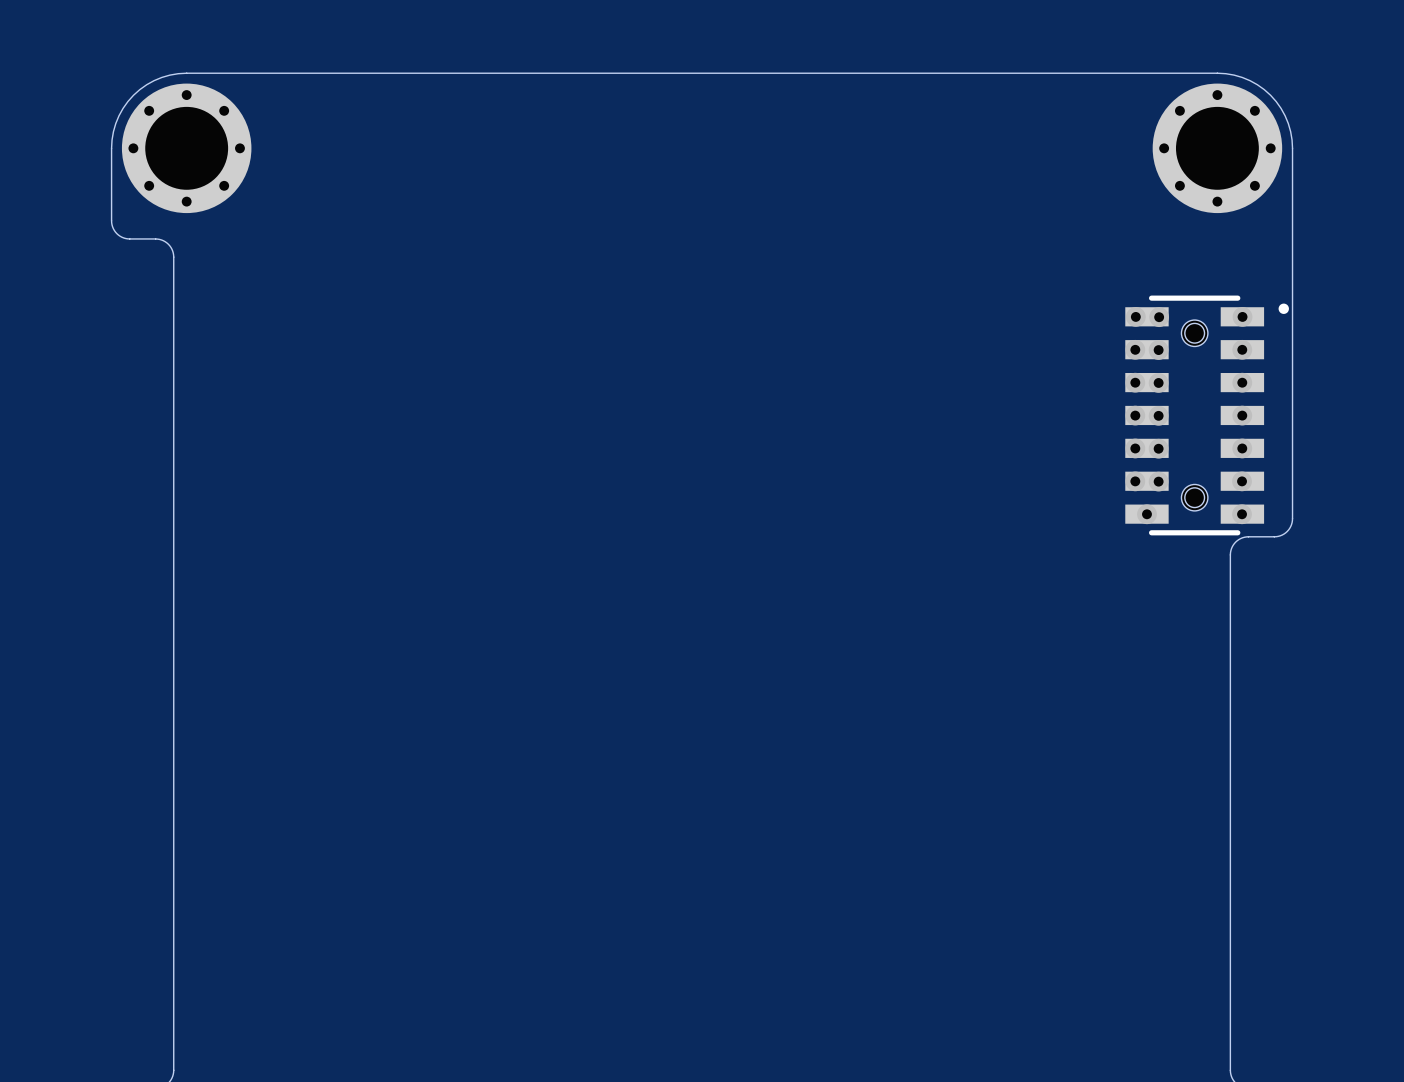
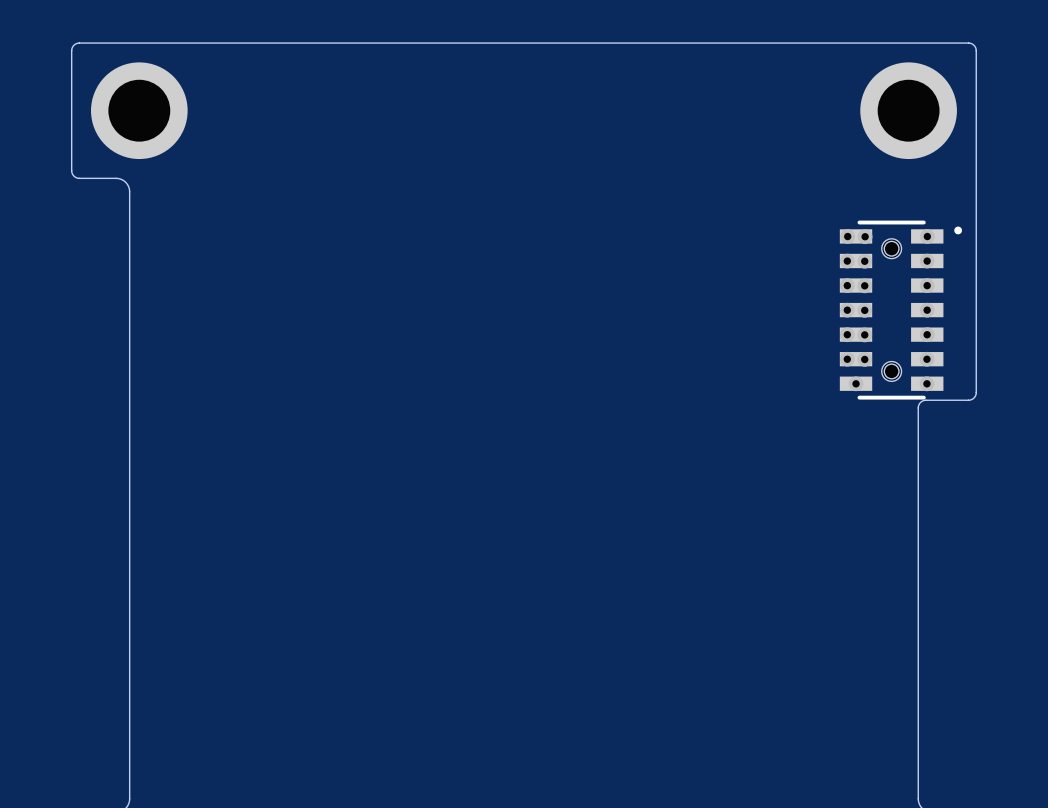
part footprint: [121, 83, 252, 214] -> [91, 62, 188, 160]
part footprint: [1152, 83, 1283, 214] -> [860, 62, 957, 160]
board edge: (129, 238) (116, 233) (111, 222) (111, 148) (115, 123) (123, 108) (139, 89) (161, 77) (178, 73) (1217, 73) (1234, 75) (1250, 80) (1270, 95) (1285, 115) (1292, 139) (1292, 518) (1288, 529) (1280, 535) (1246, 536) (1238, 539) (1232, 547) (1230, 554) -> (96, 178) (77, 178) (71, 171) (71, 50) (73, 46) (78, 43) (970, 43) (974, 46) (976, 50) (976, 393) (973, 397) (969, 400) (923, 400) (918, 405) (918, 414)

